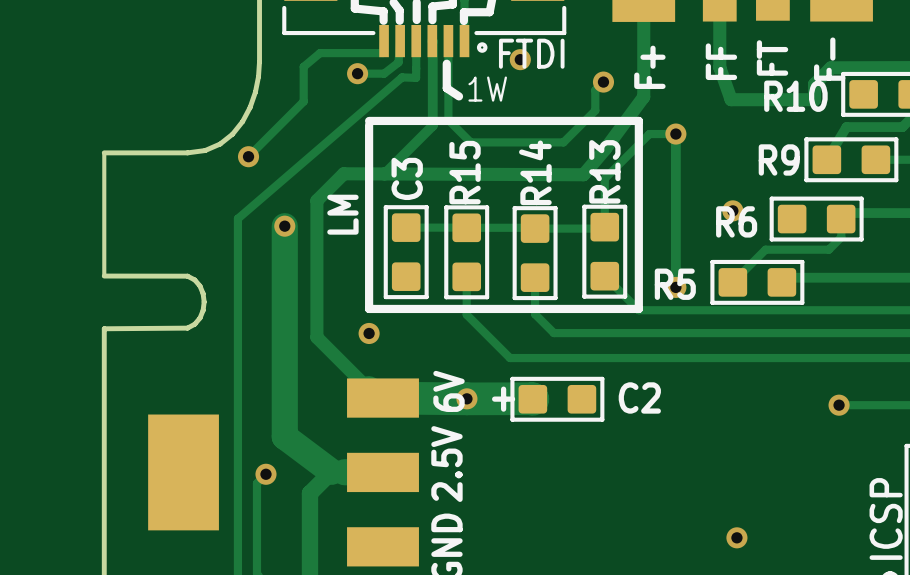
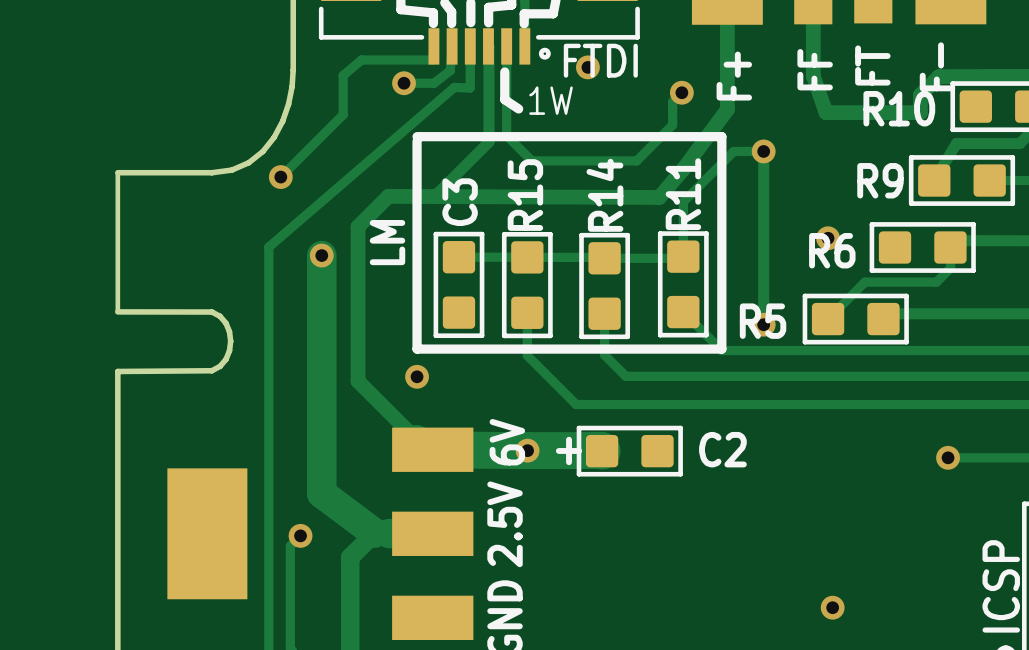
R13 name: R13 (604, 171) -> R11 (683, 194)

